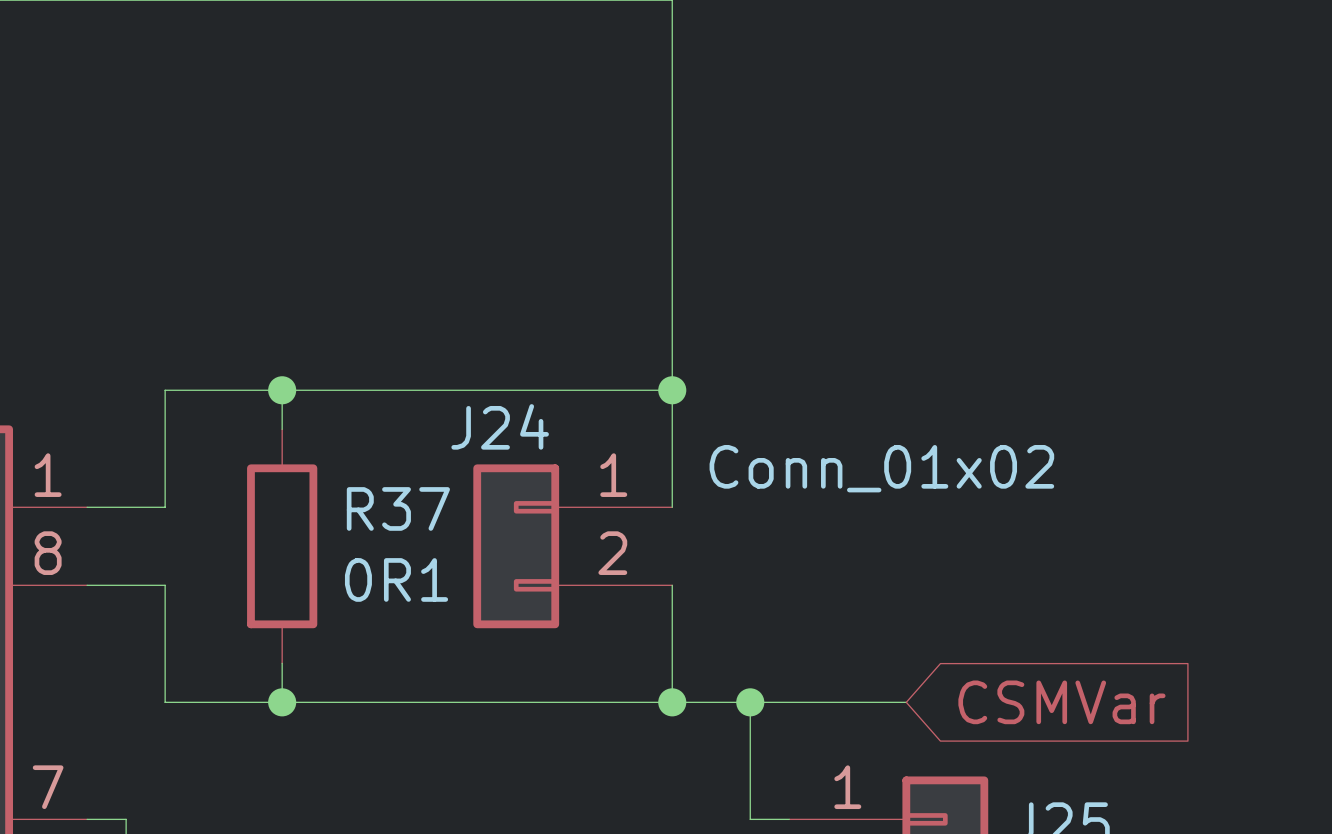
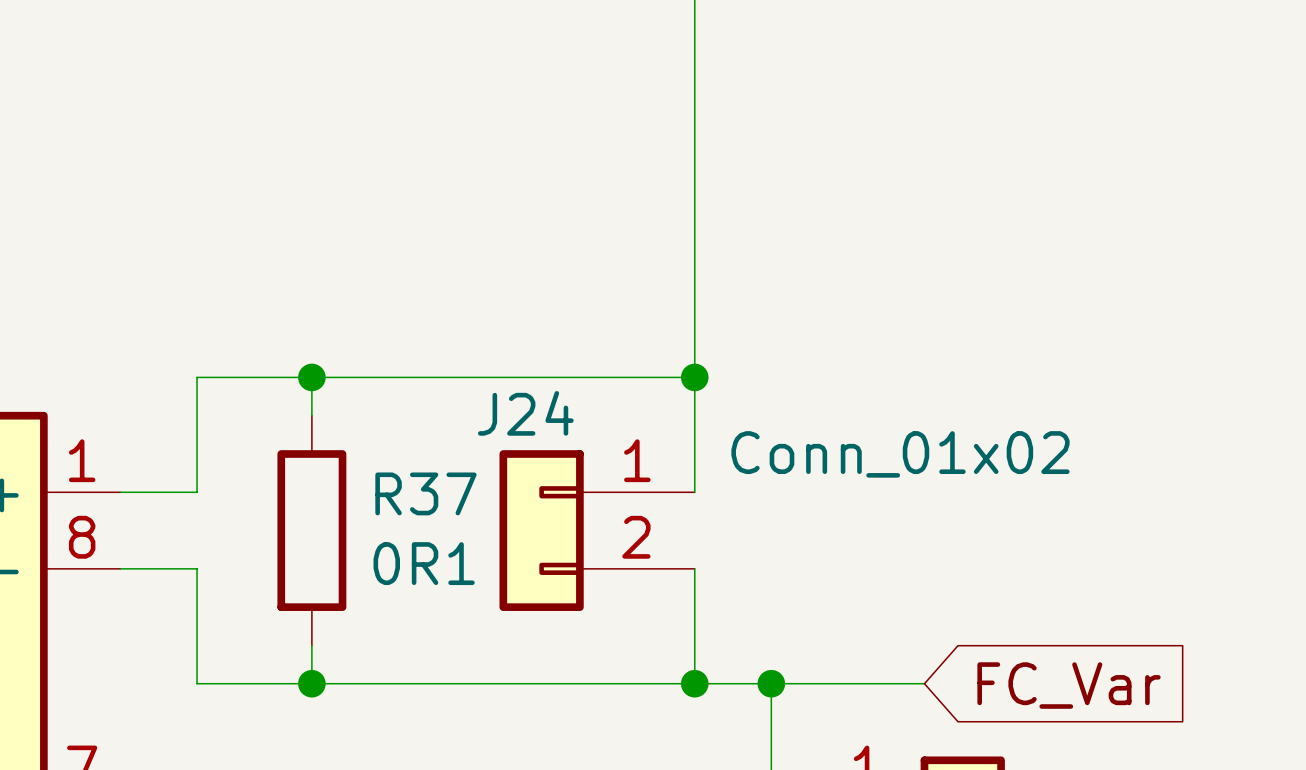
global label: CSMVar (1061, 702) -> FC_Var (1069, 685)

